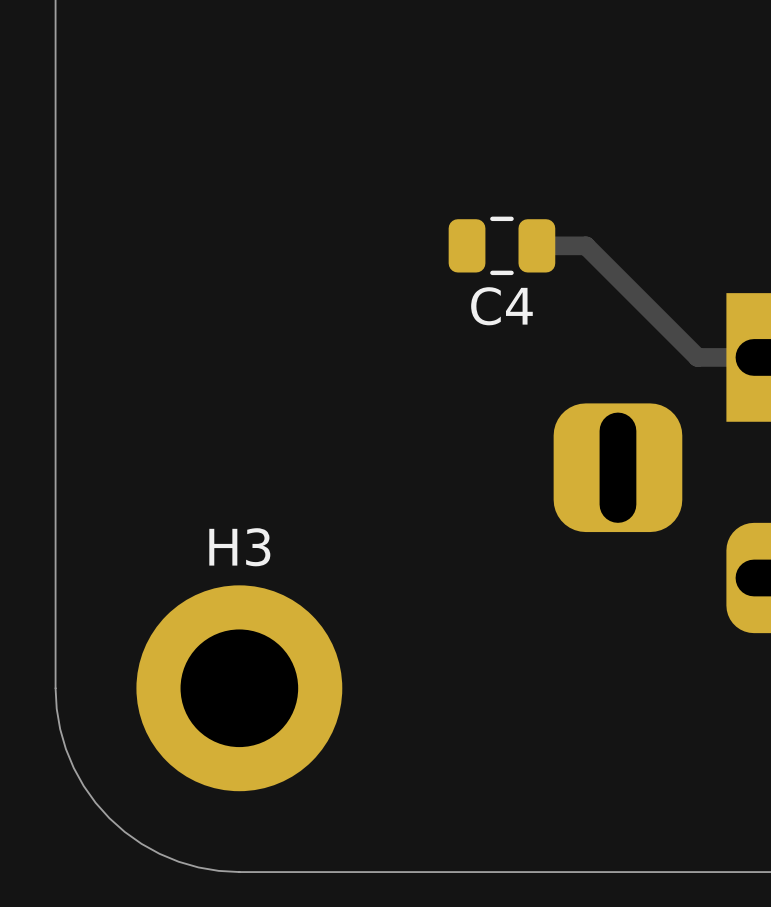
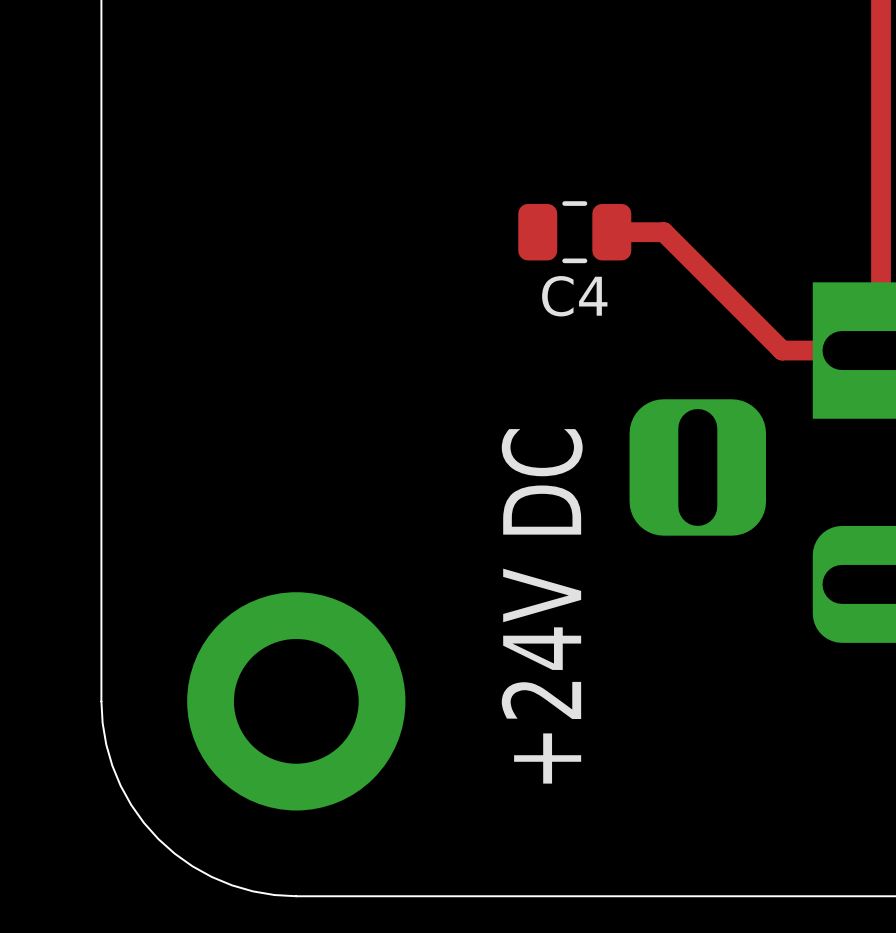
H3 name: H3 (239, 547) -> none
text: none -> +24V DC (542, 606)

